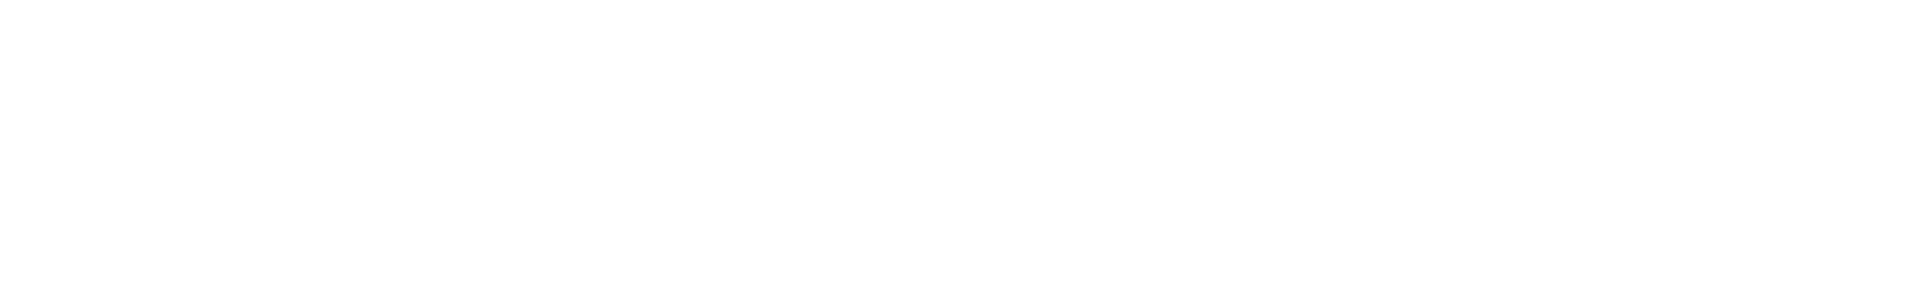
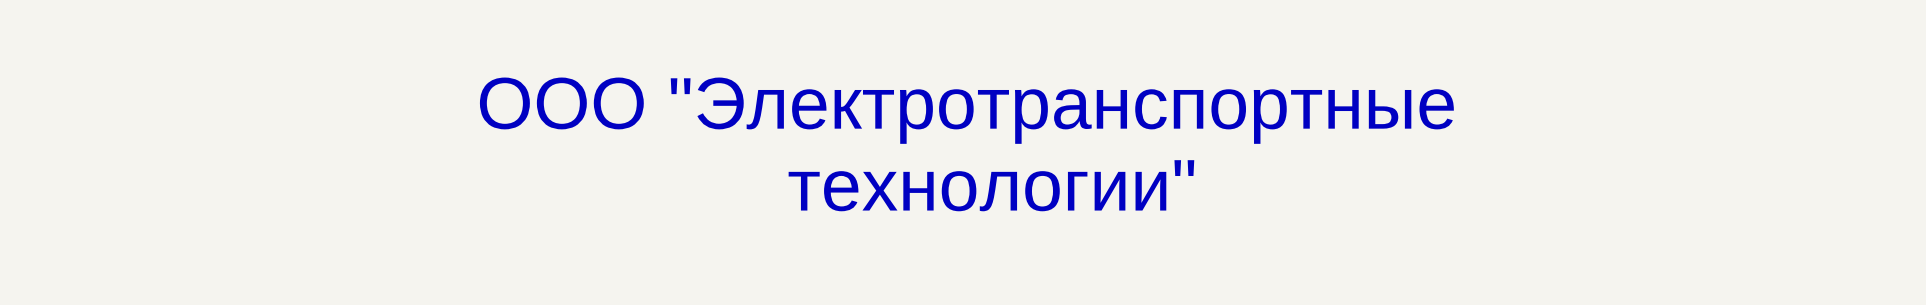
text: none -> ООО "Электротранспортные (966, 110)
text: none -> технологии" (991, 185)

